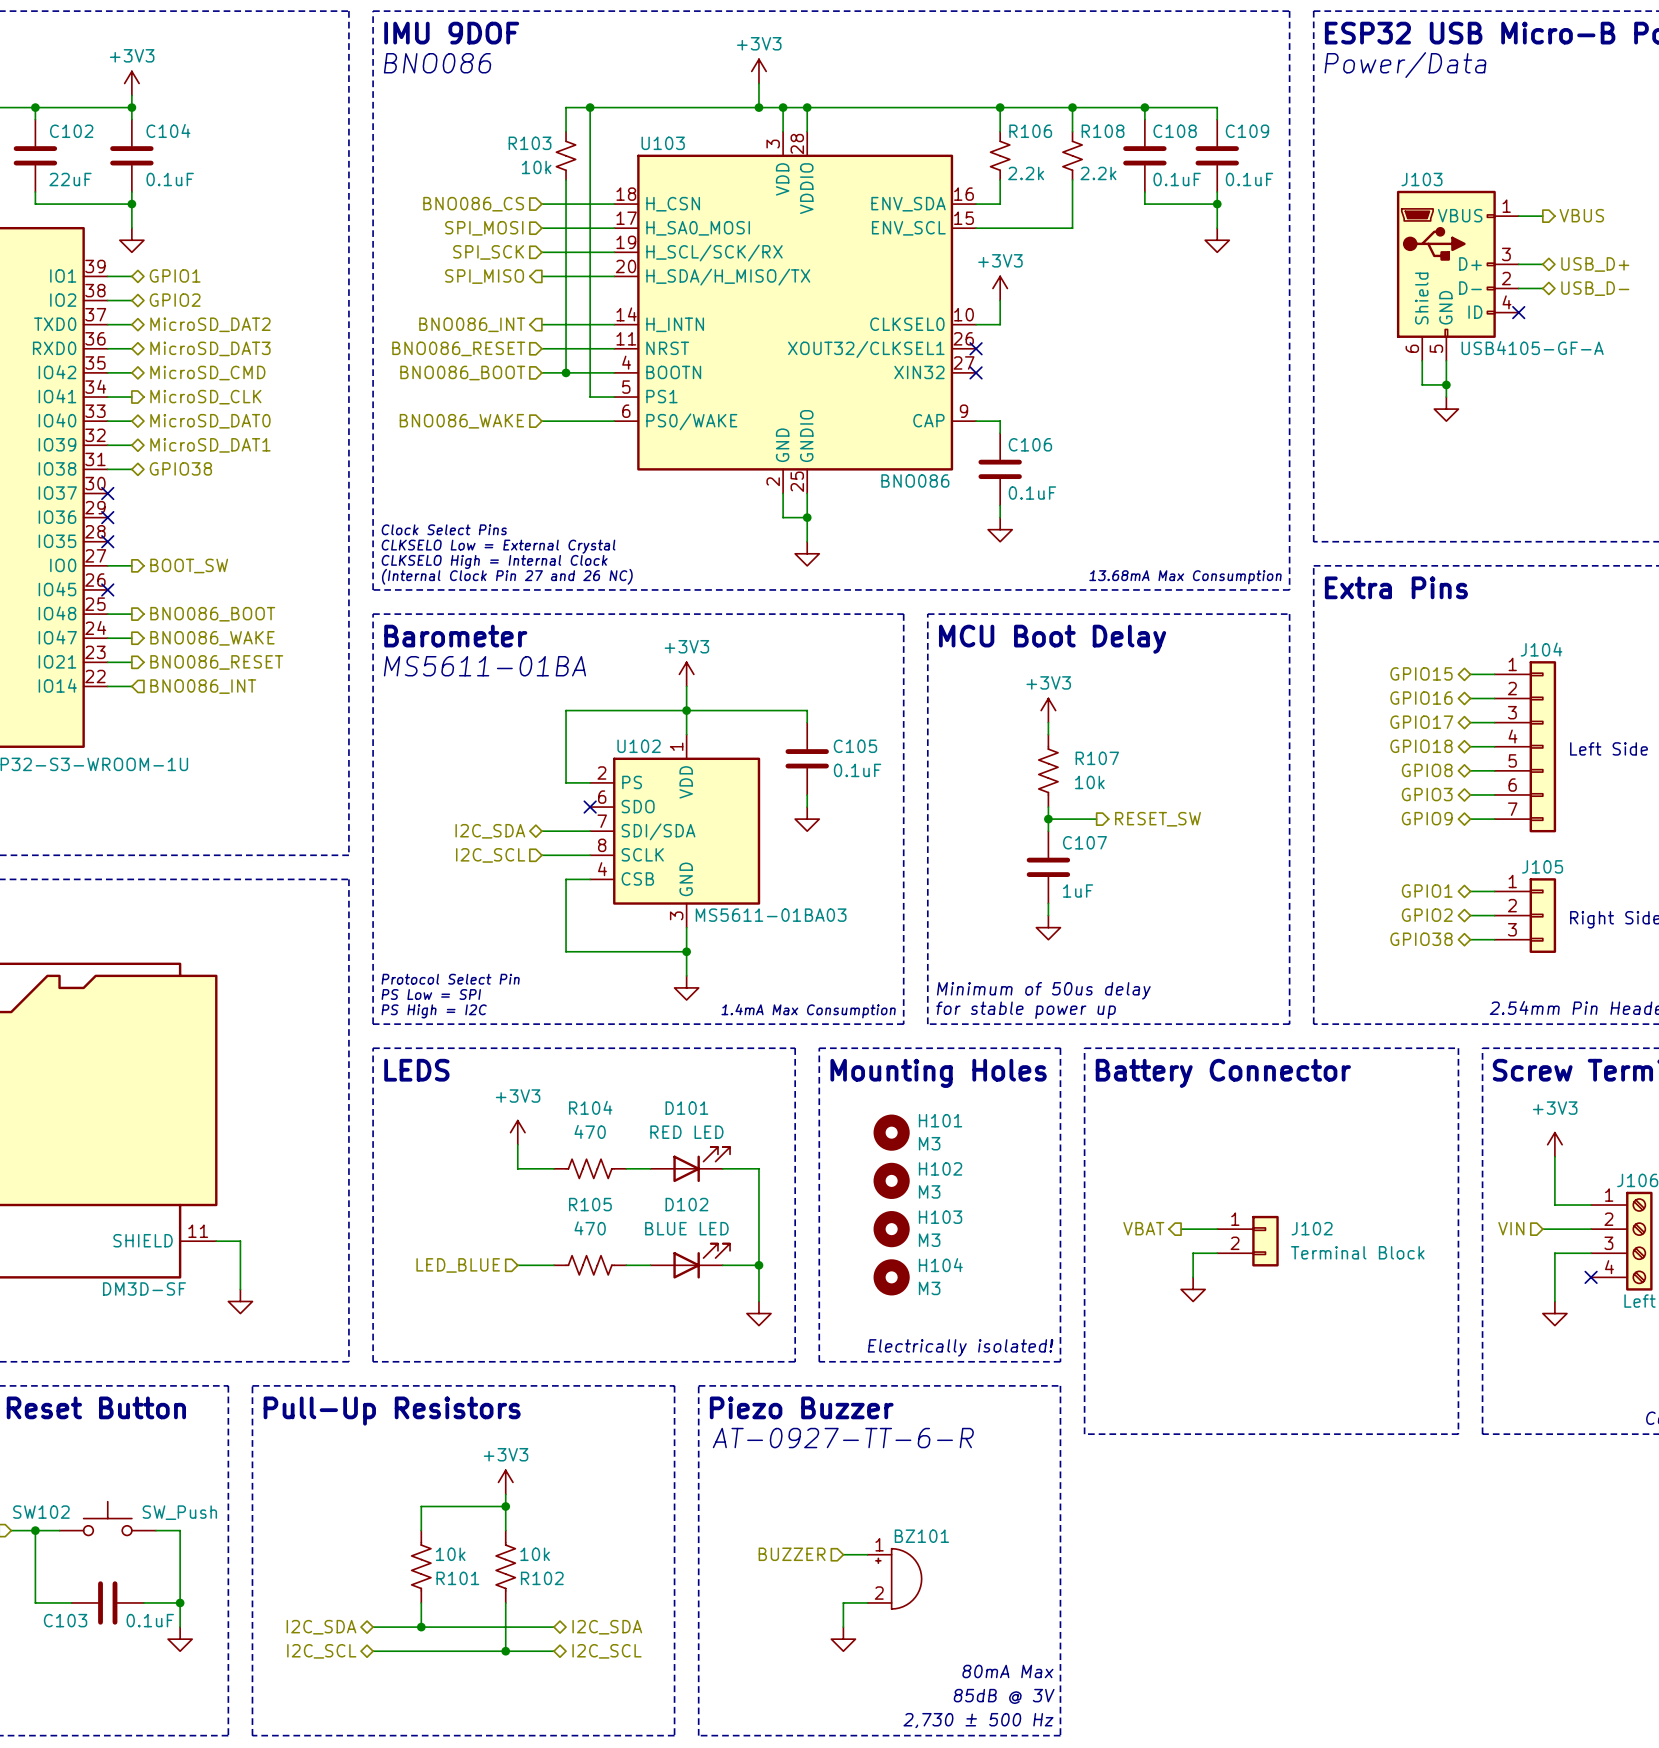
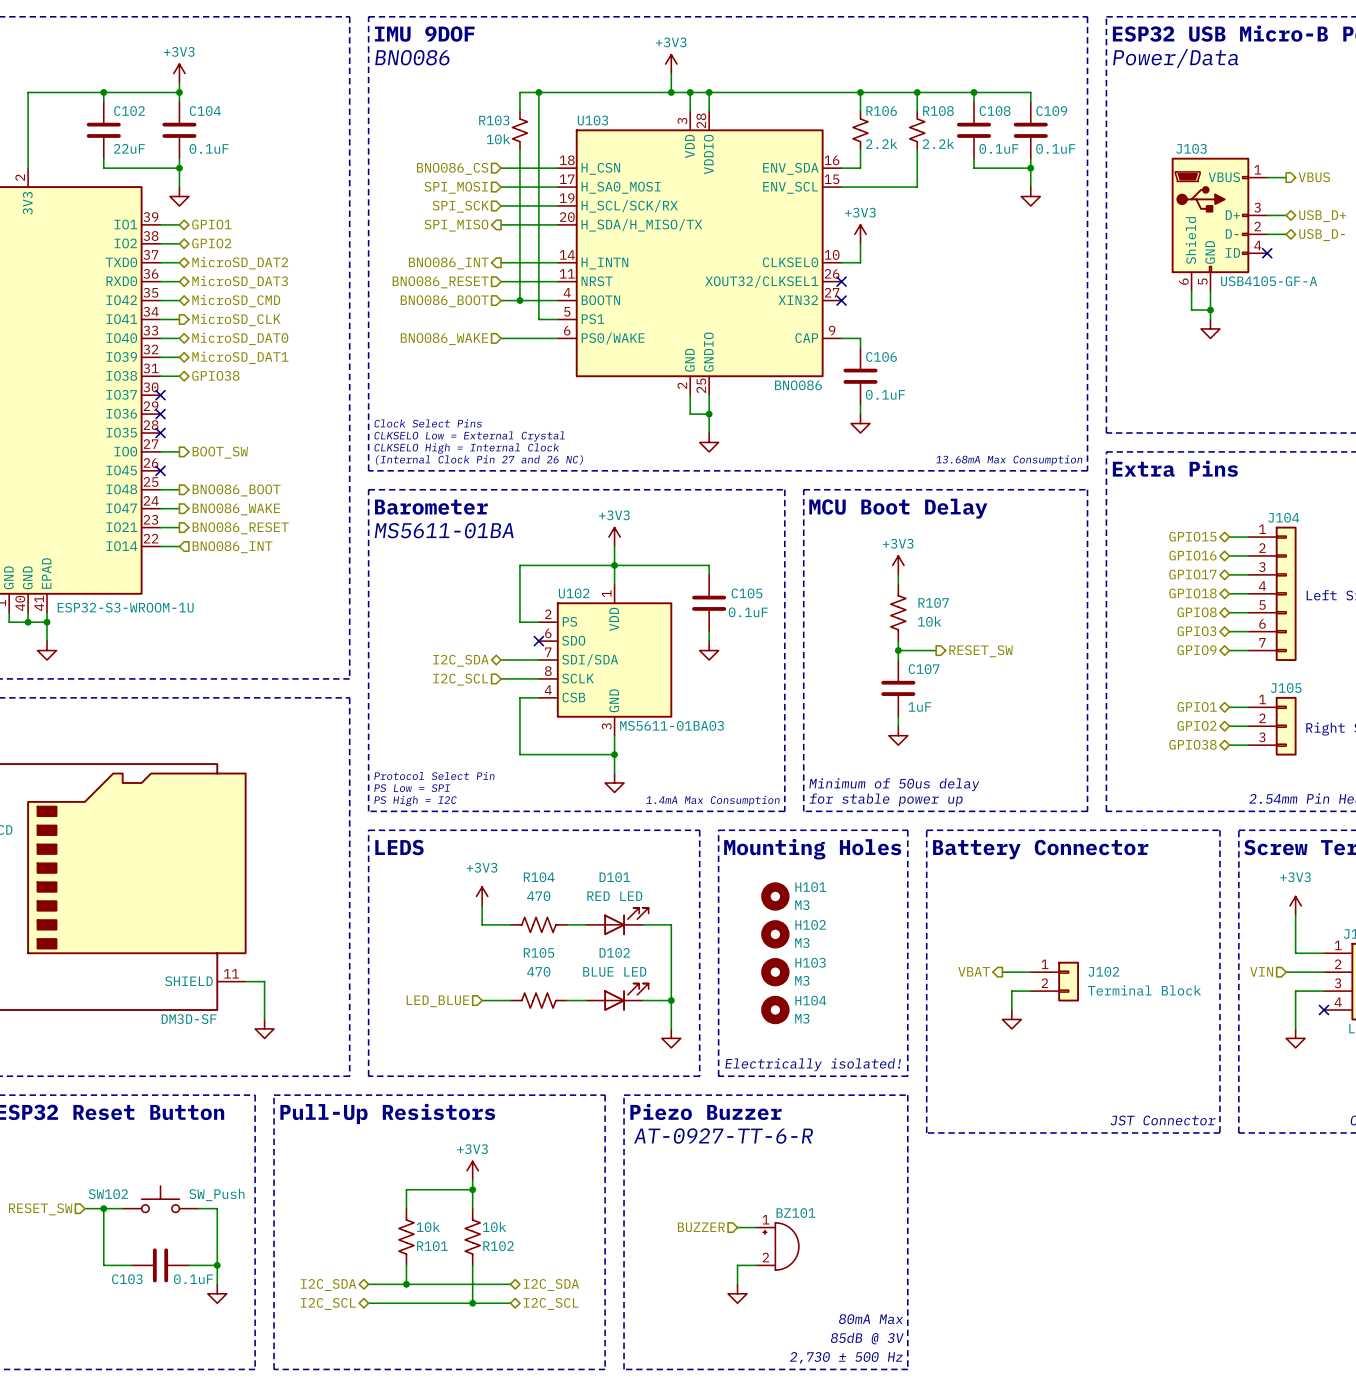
text: none -> JST Connector (1163, 1120)

